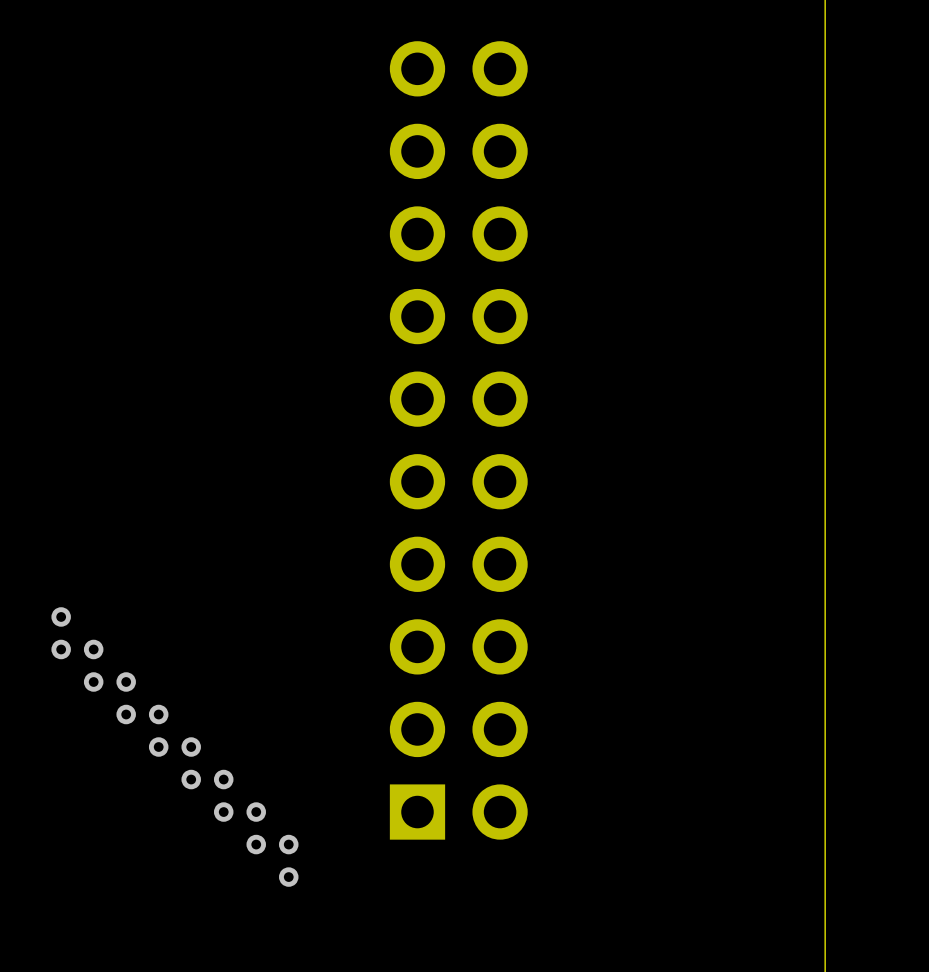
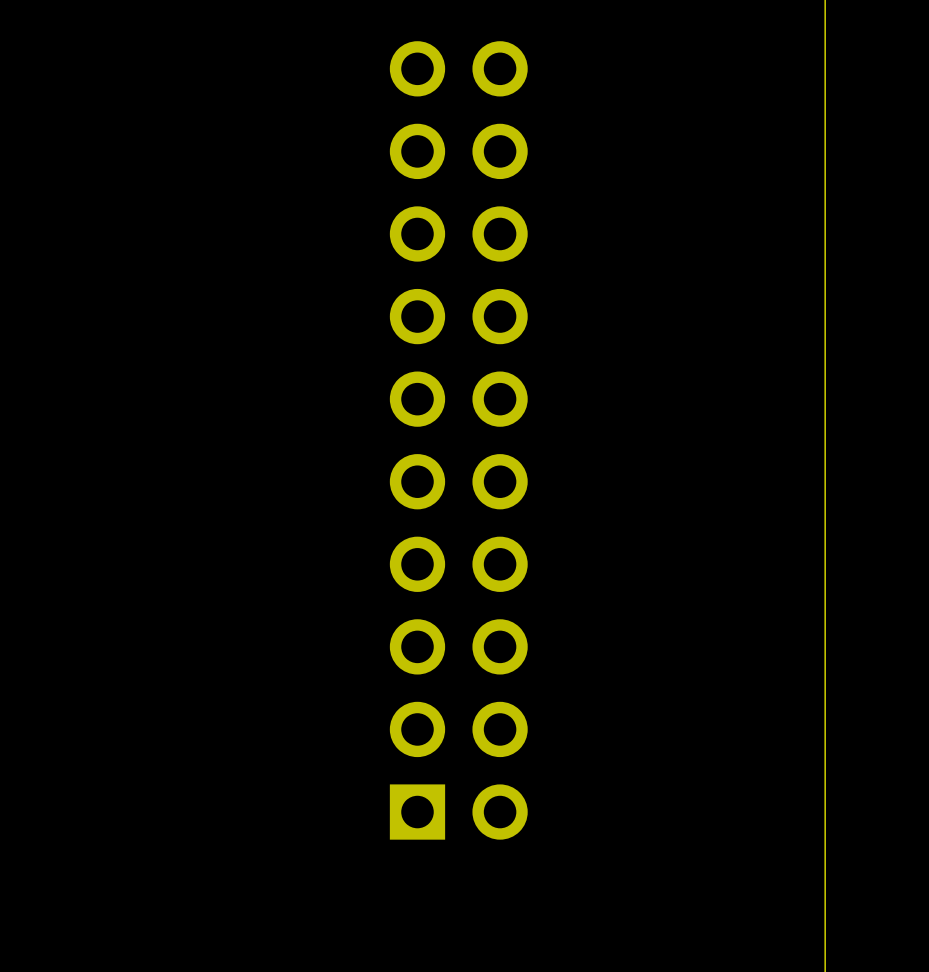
via: (61, 616) -> none
via: (61, 649) -> none
via: (93, 649) -> none
via: (93, 681) -> none
via: (126, 681) -> none
via: (126, 714) -> none
via: (158, 714) -> none
via: (158, 747) -> none
via: (191, 747) -> none
via: (191, 779) -> none
via: (223, 779) -> none
via: (223, 812) -> none
via: (256, 812) -> none
via: (256, 844) -> none
via: (288, 844) -> none
via: (288, 877) -> none

